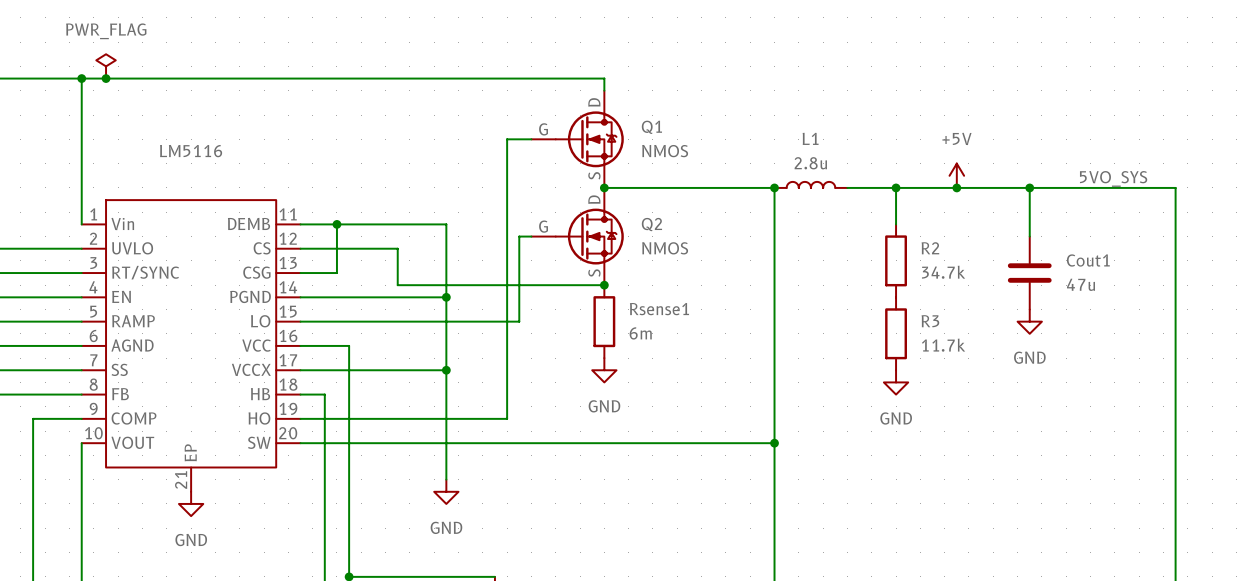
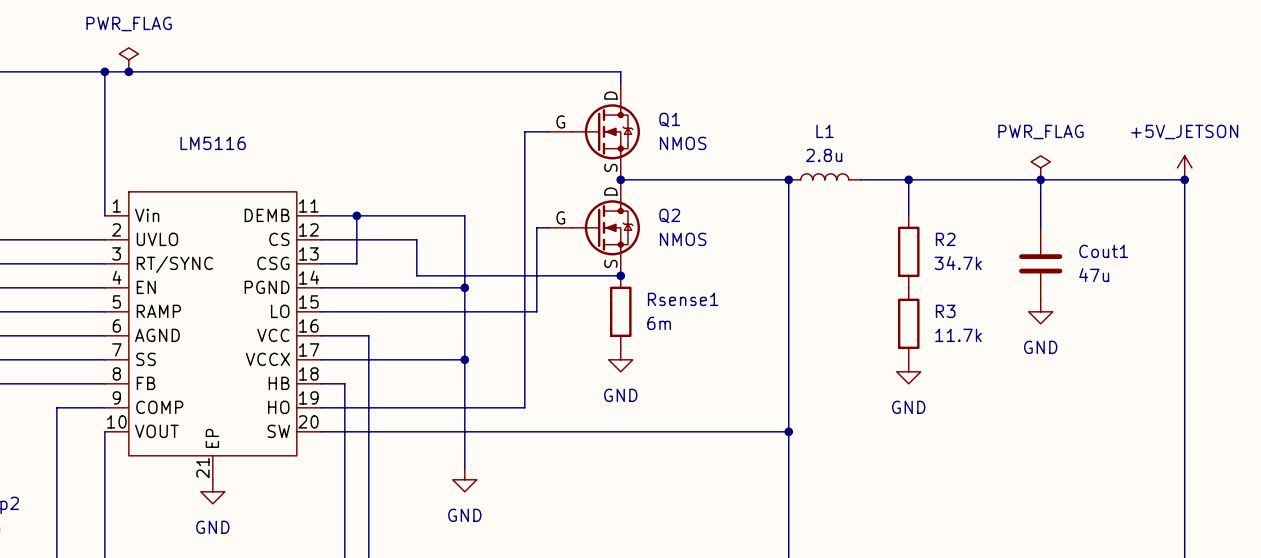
power symbol: +5V (956, 175) -> none
power symbol: none -> PWR_FLAG (1040, 167)
power symbol: none -> +5V_JETSON (1184, 167)
label: 5VO_SYS (1113, 178) -> none
junction: (956, 187) -> none
junction: none -> (1184, 179)

